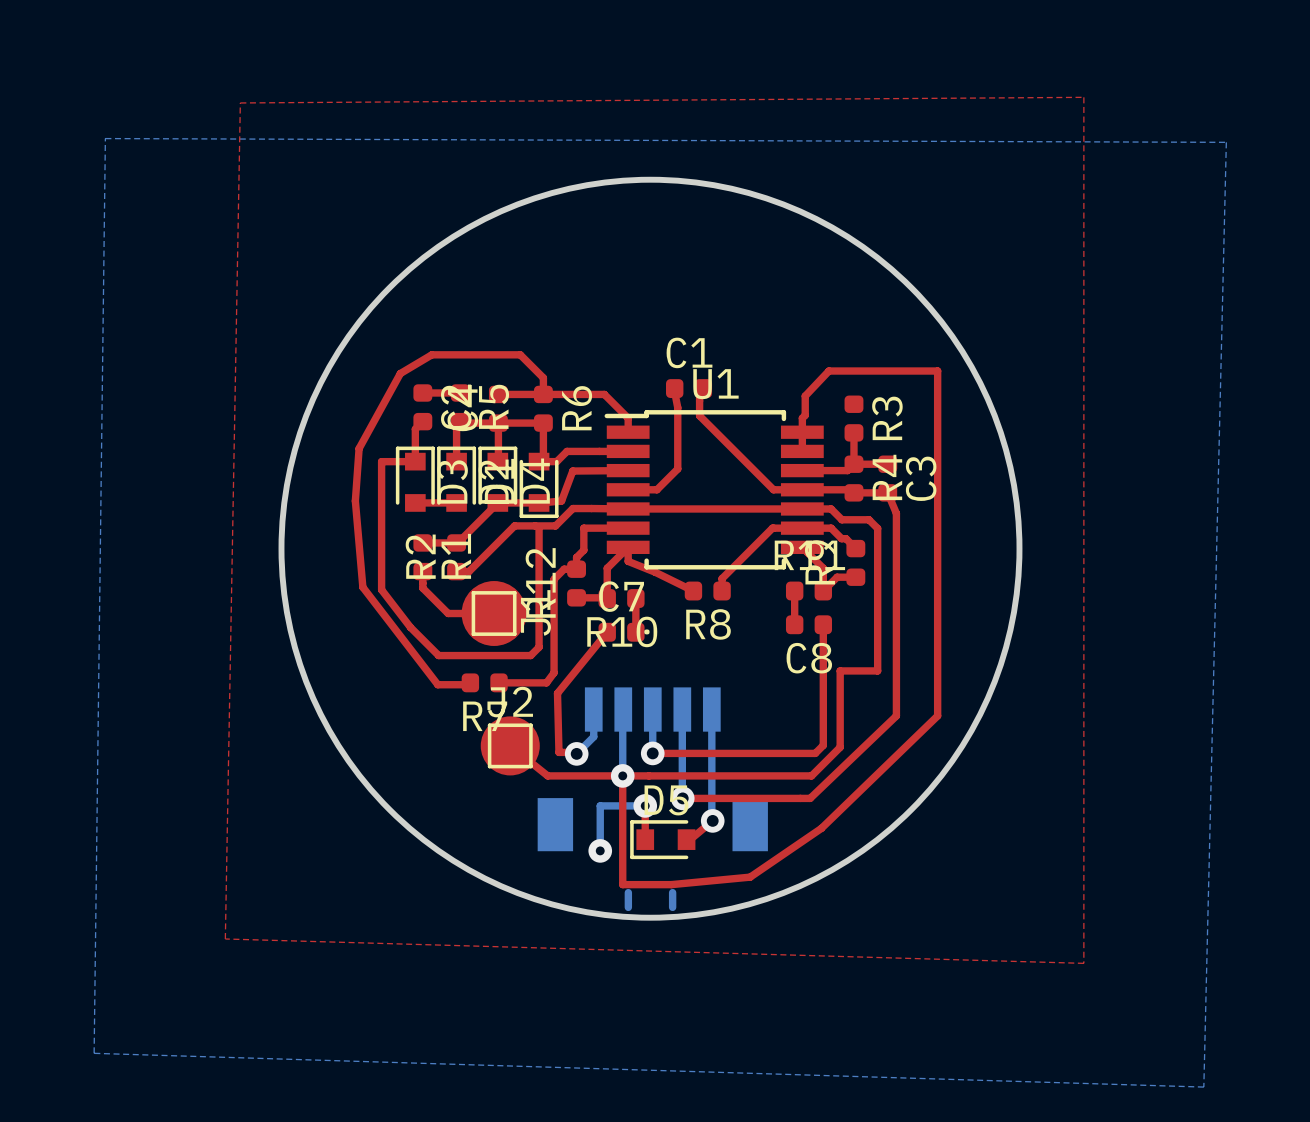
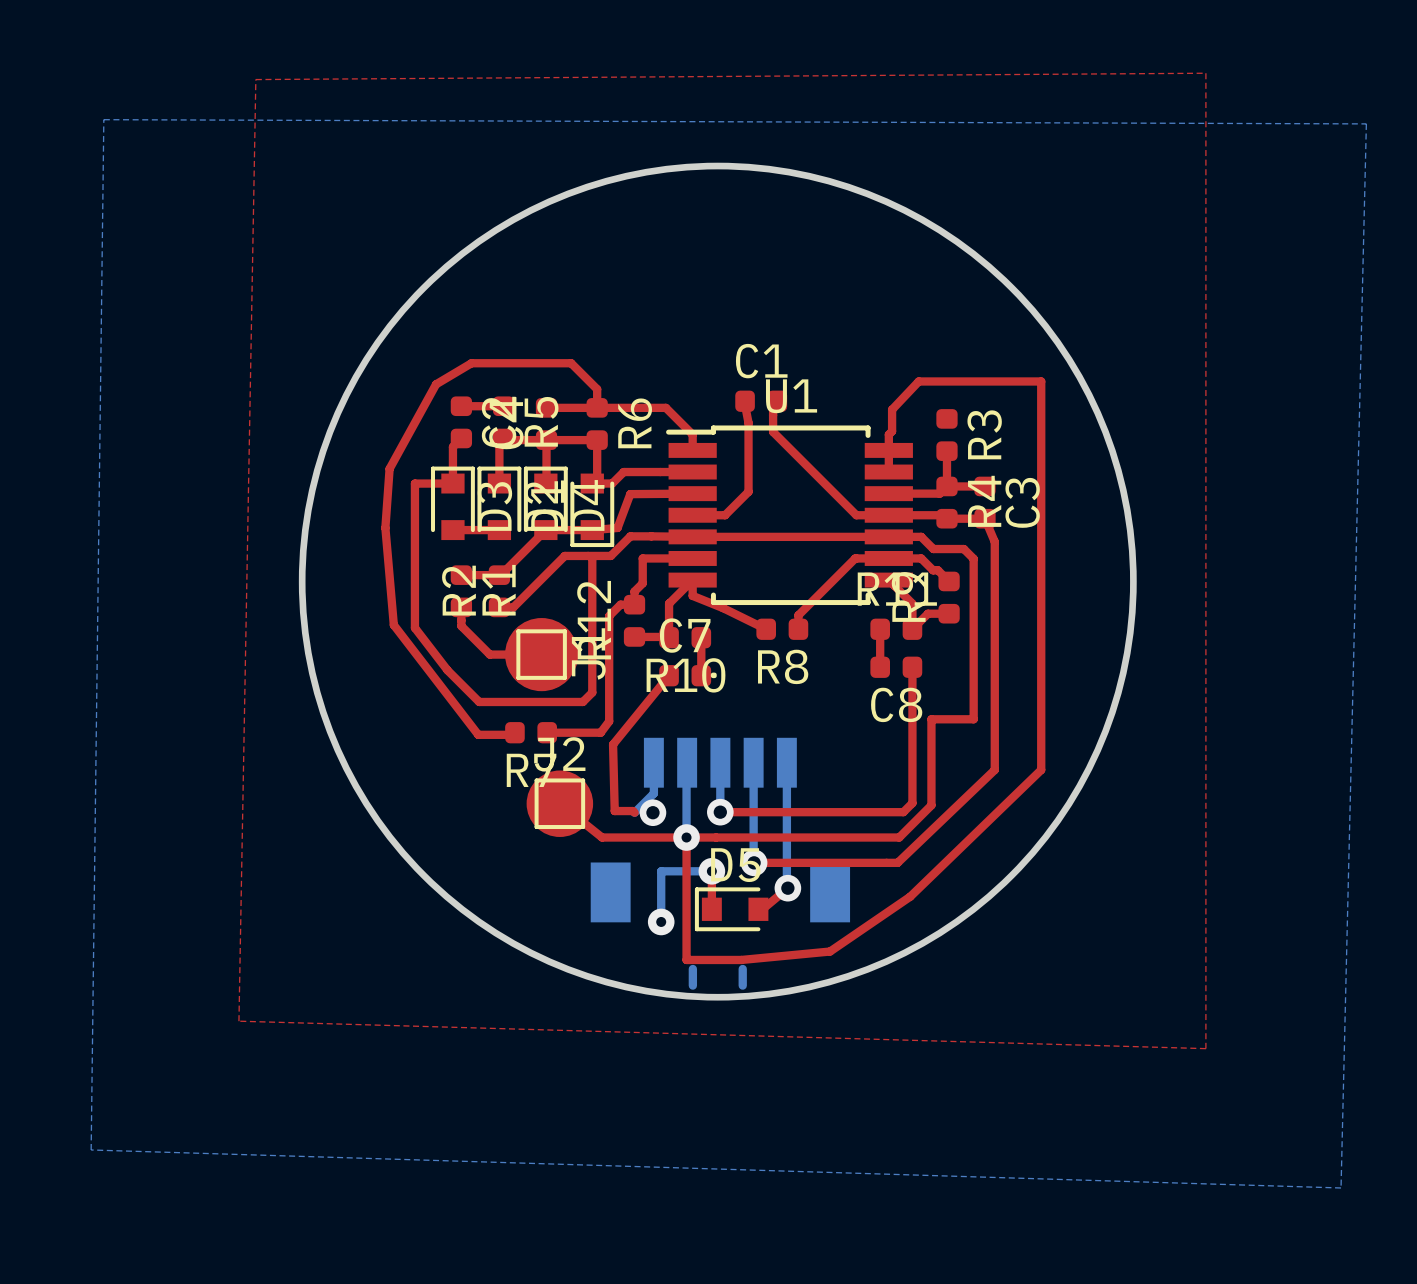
via position: (576, 753) -> (652, 812)

